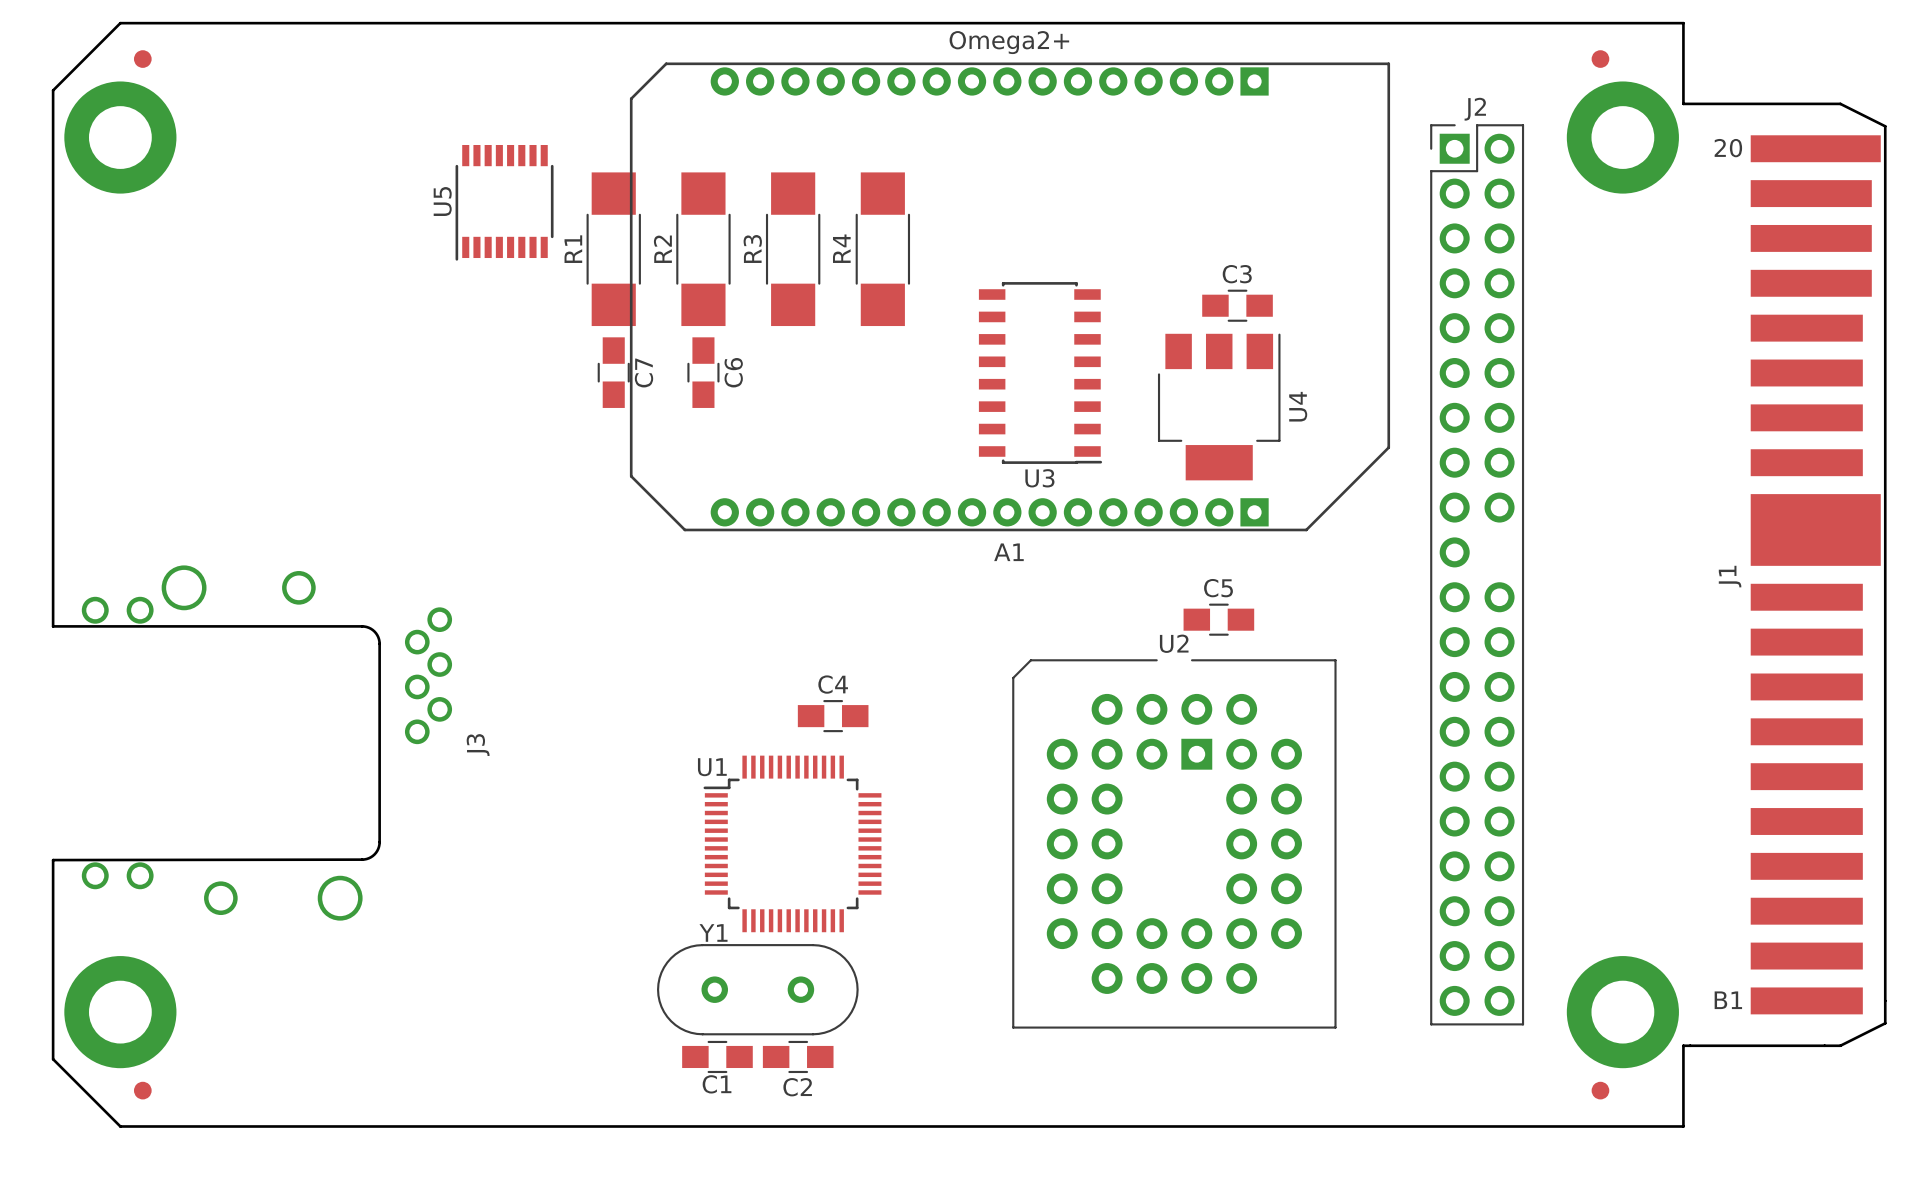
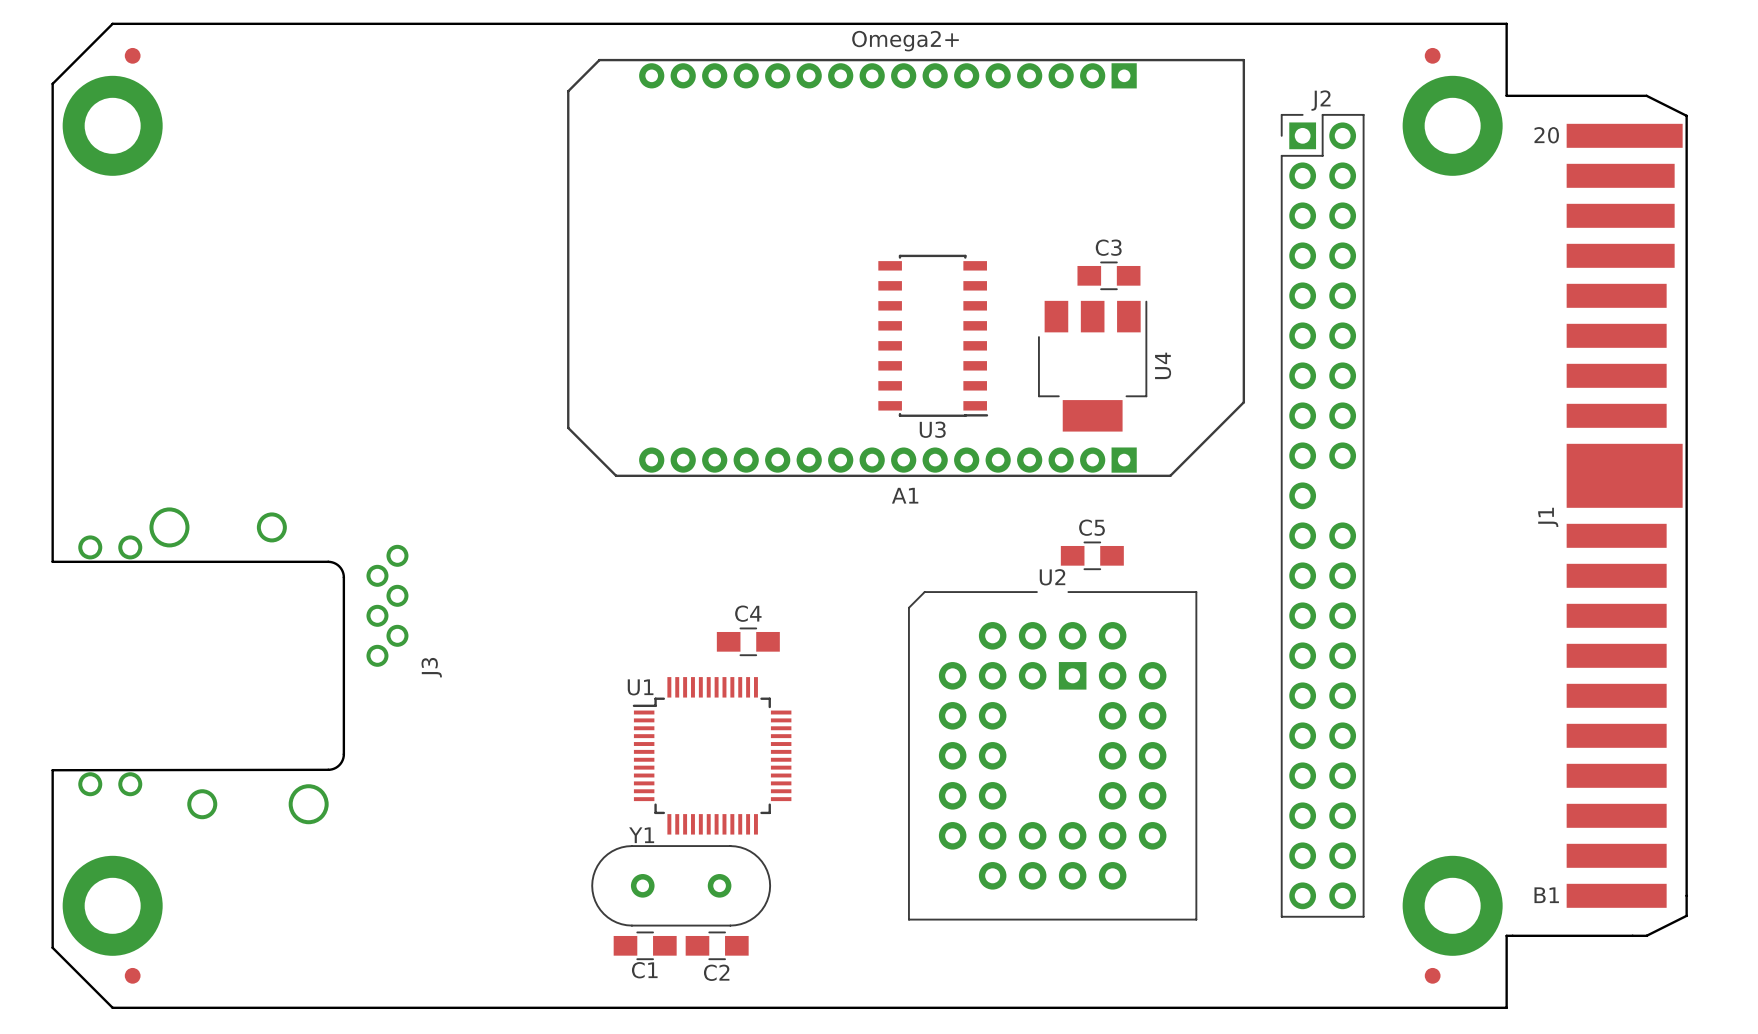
U5: (504, 202) -> none
R1: (613, 249) -> none
R2: (703, 249) -> none
R3: (793, 249) -> none
R4: (882, 249) -> none
C7: (613, 372) -> none
C6: (703, 372) -> none

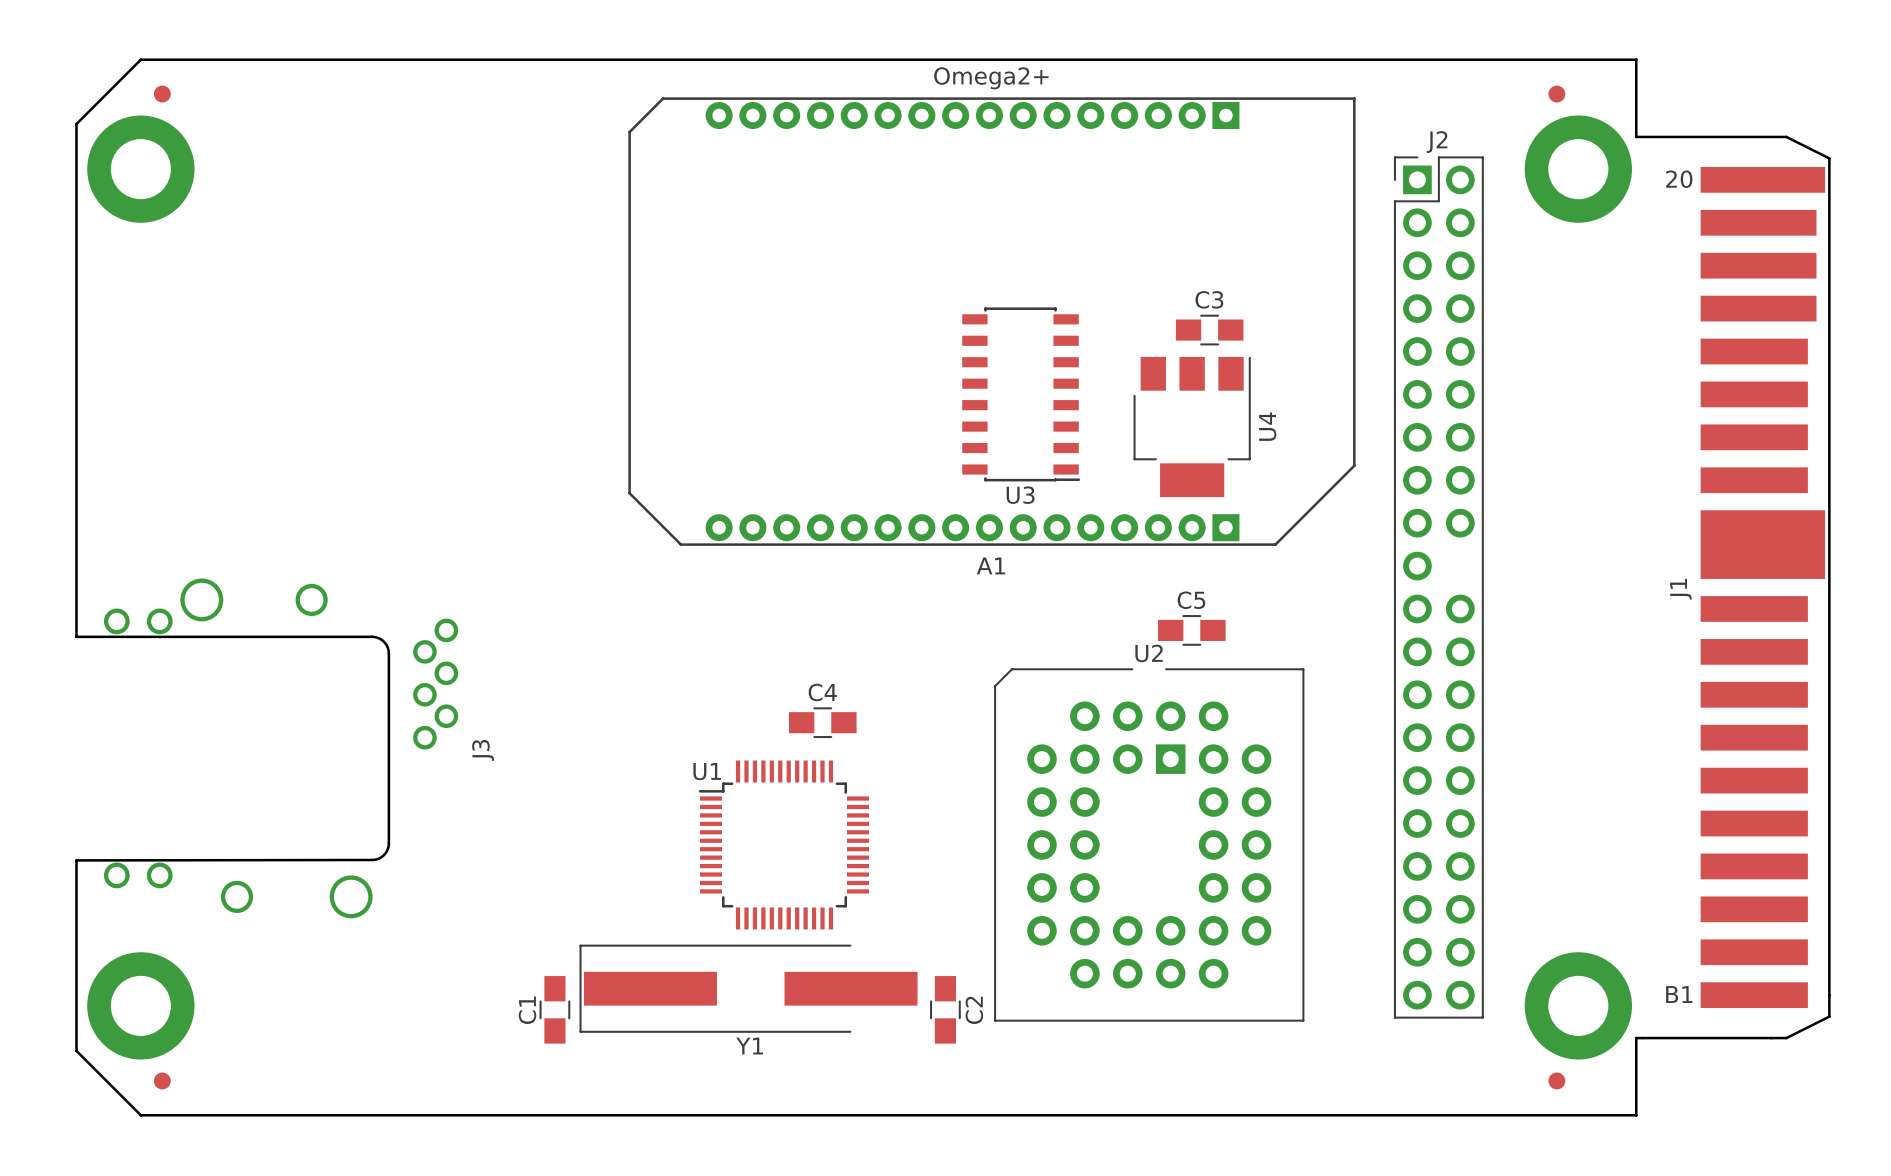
Y1 name position: Y1 (641, 835) -> Y1 (749, 1046)
Y1 footprint: [591, 845, 772, 927] -> [579, 944, 918, 1033]
C1 rotation: 0° (645, 945) -> 90° clockwise (554, 1009)
C1 position: (645, 945) -> (554, 1009)
C2 rotation: 0° (717, 945) -> 90° clockwise (945, 1009)
C2 position: (717, 945) -> (945, 1009)
C2 name position: C2 (716, 972) -> C2 (974, 1010)

